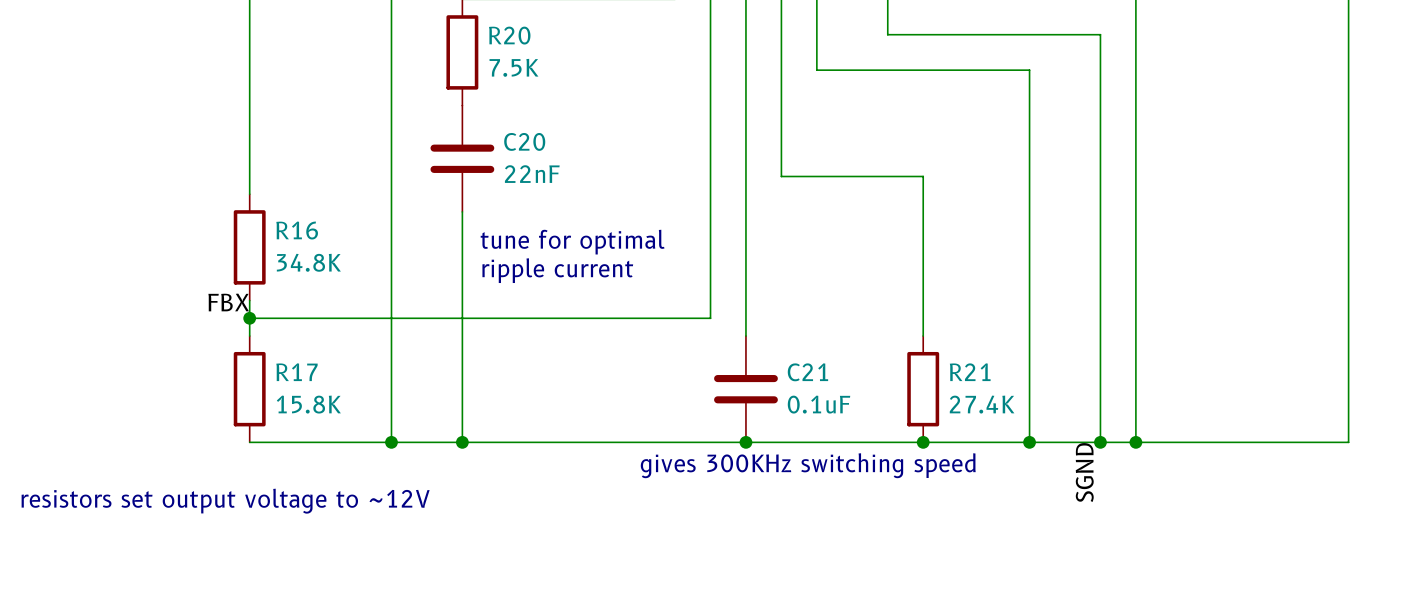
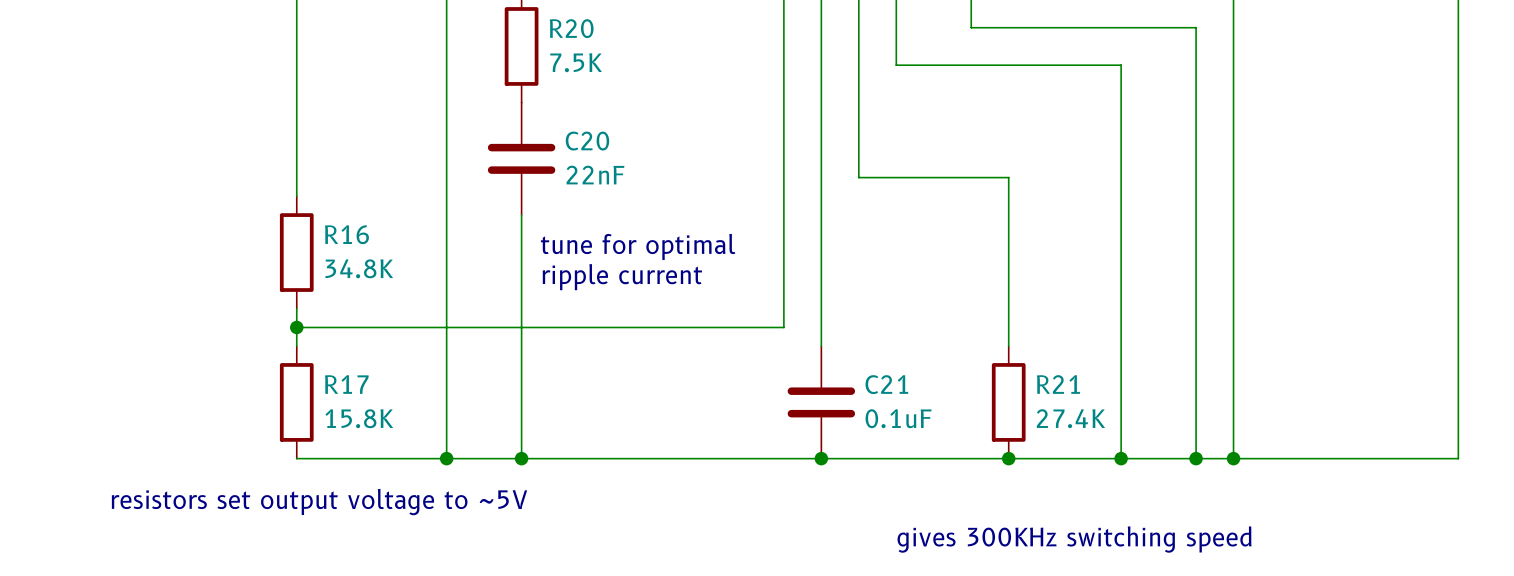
label: FBX (228, 302) -> none
text position: gives 300KHz switching speed (808, 465) -> gives 300KHz switching speed (1074, 539)
label: SGND (1084, 472) -> none
text: resistors set output voltage to ~12V (225, 501) -> resistors set output voltage to ~5V (319, 502)

